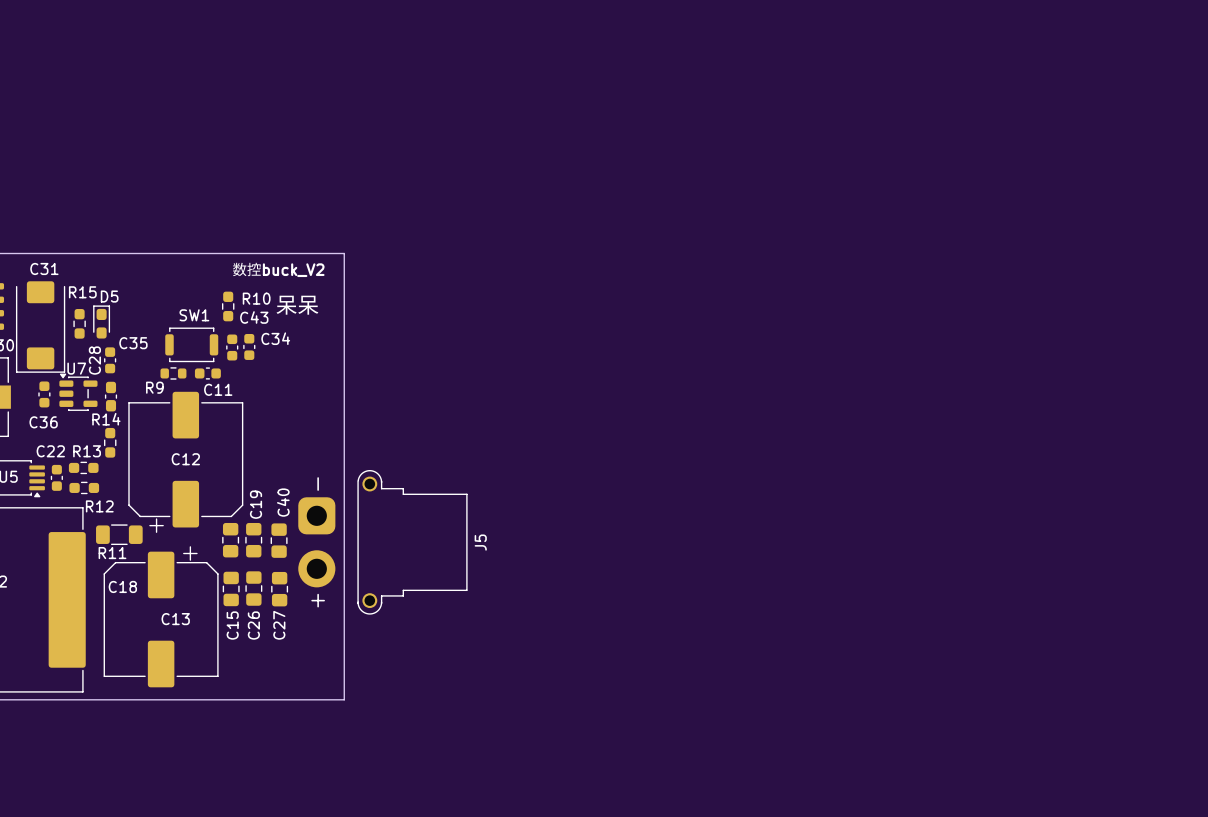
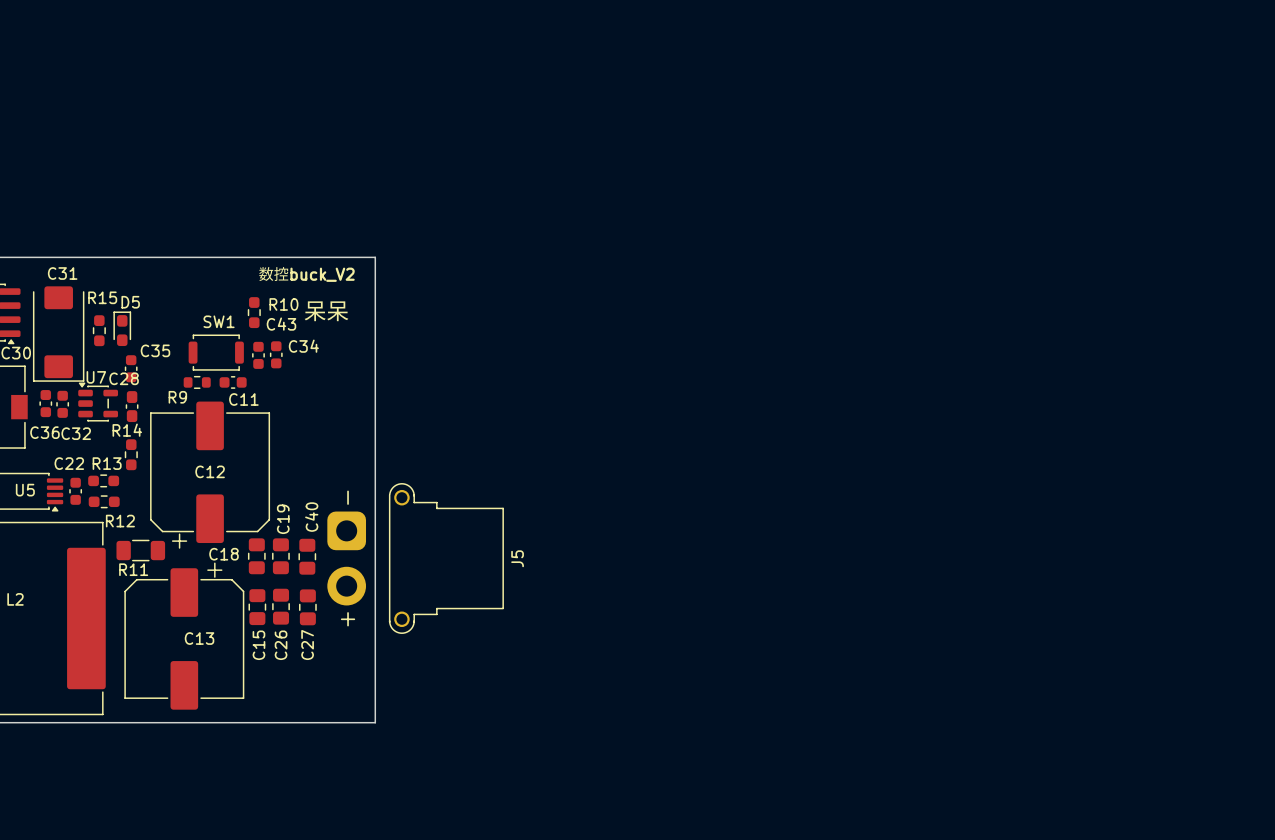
C28 name rotation: 0° (94, 360) -> 90° clockwise (124, 378)
C36: none -> (45, 403)
C36 name: C36 (43, 422) -> C32 (76, 433)
C18 name position: C18 (122, 586) -> C18 (224, 554)

